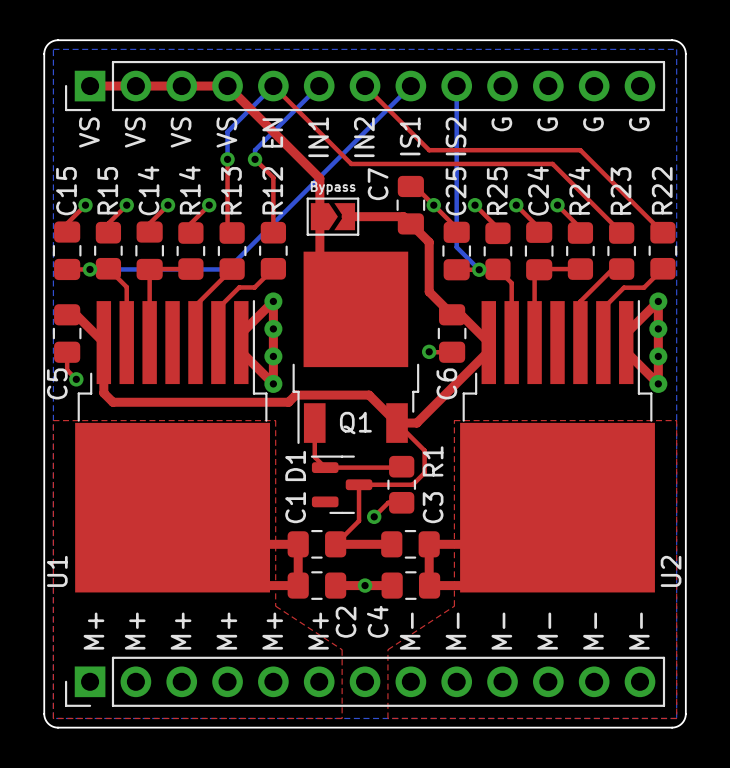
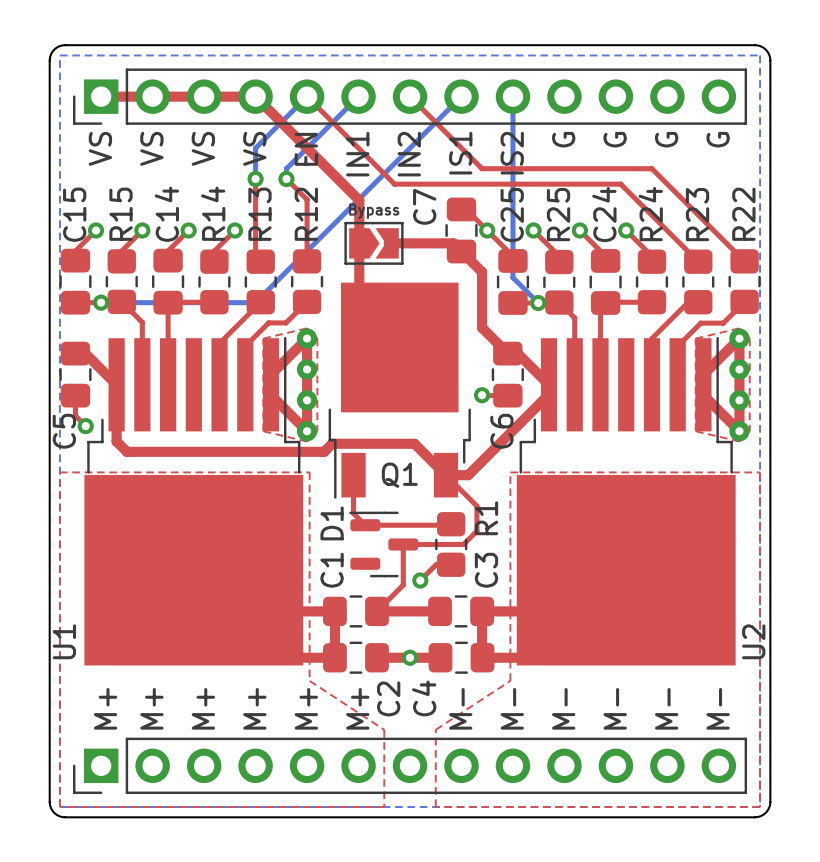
top zone outline: none -> (307, 328) (263, 338) (263, 431) (307, 441) (317, 431) (317, 338) (307, 328)
top zone outline: none -> (739, 328) (695, 338) (695, 431) (739, 441) (749, 431) (749, 338) (739, 328)

